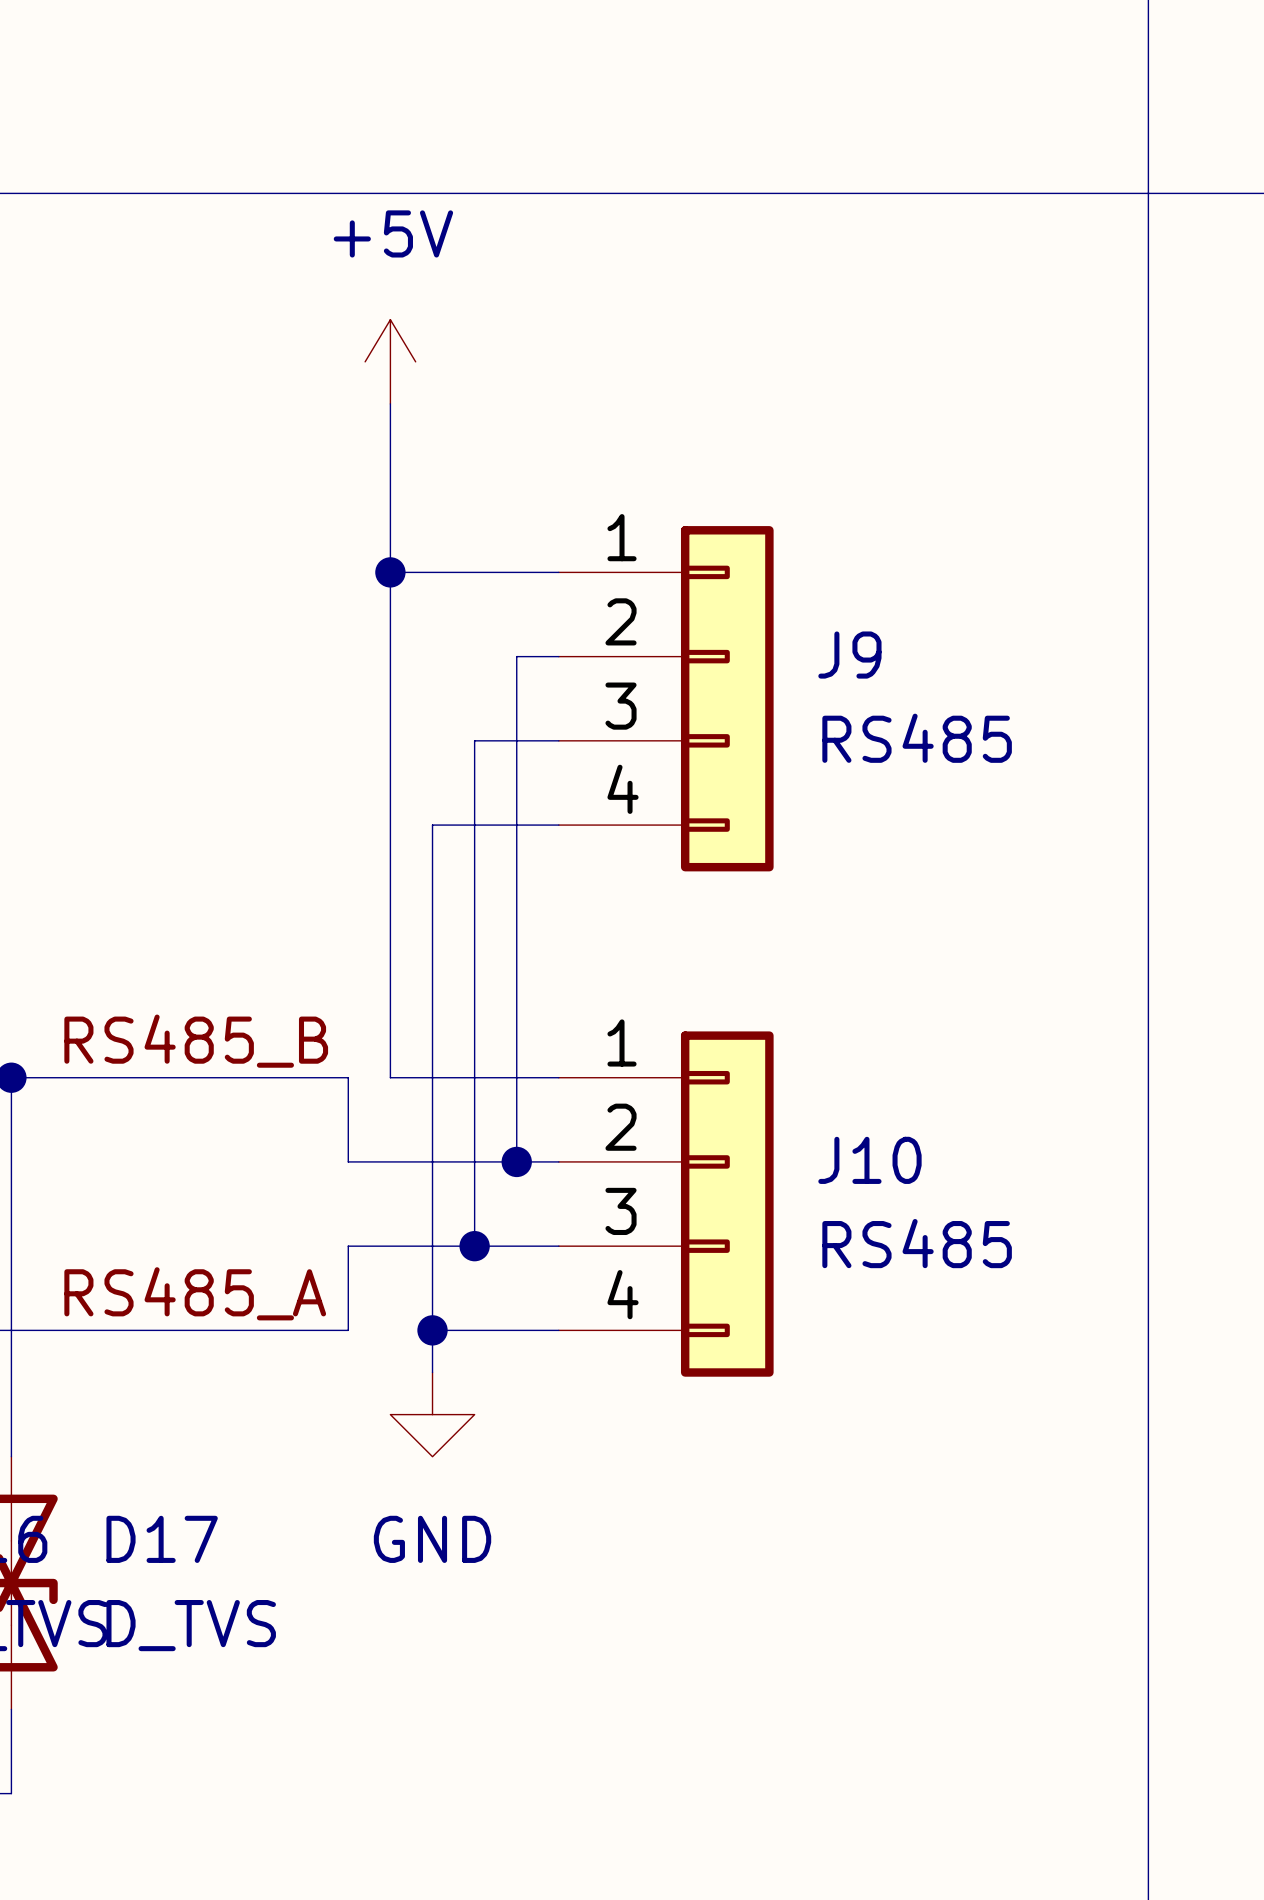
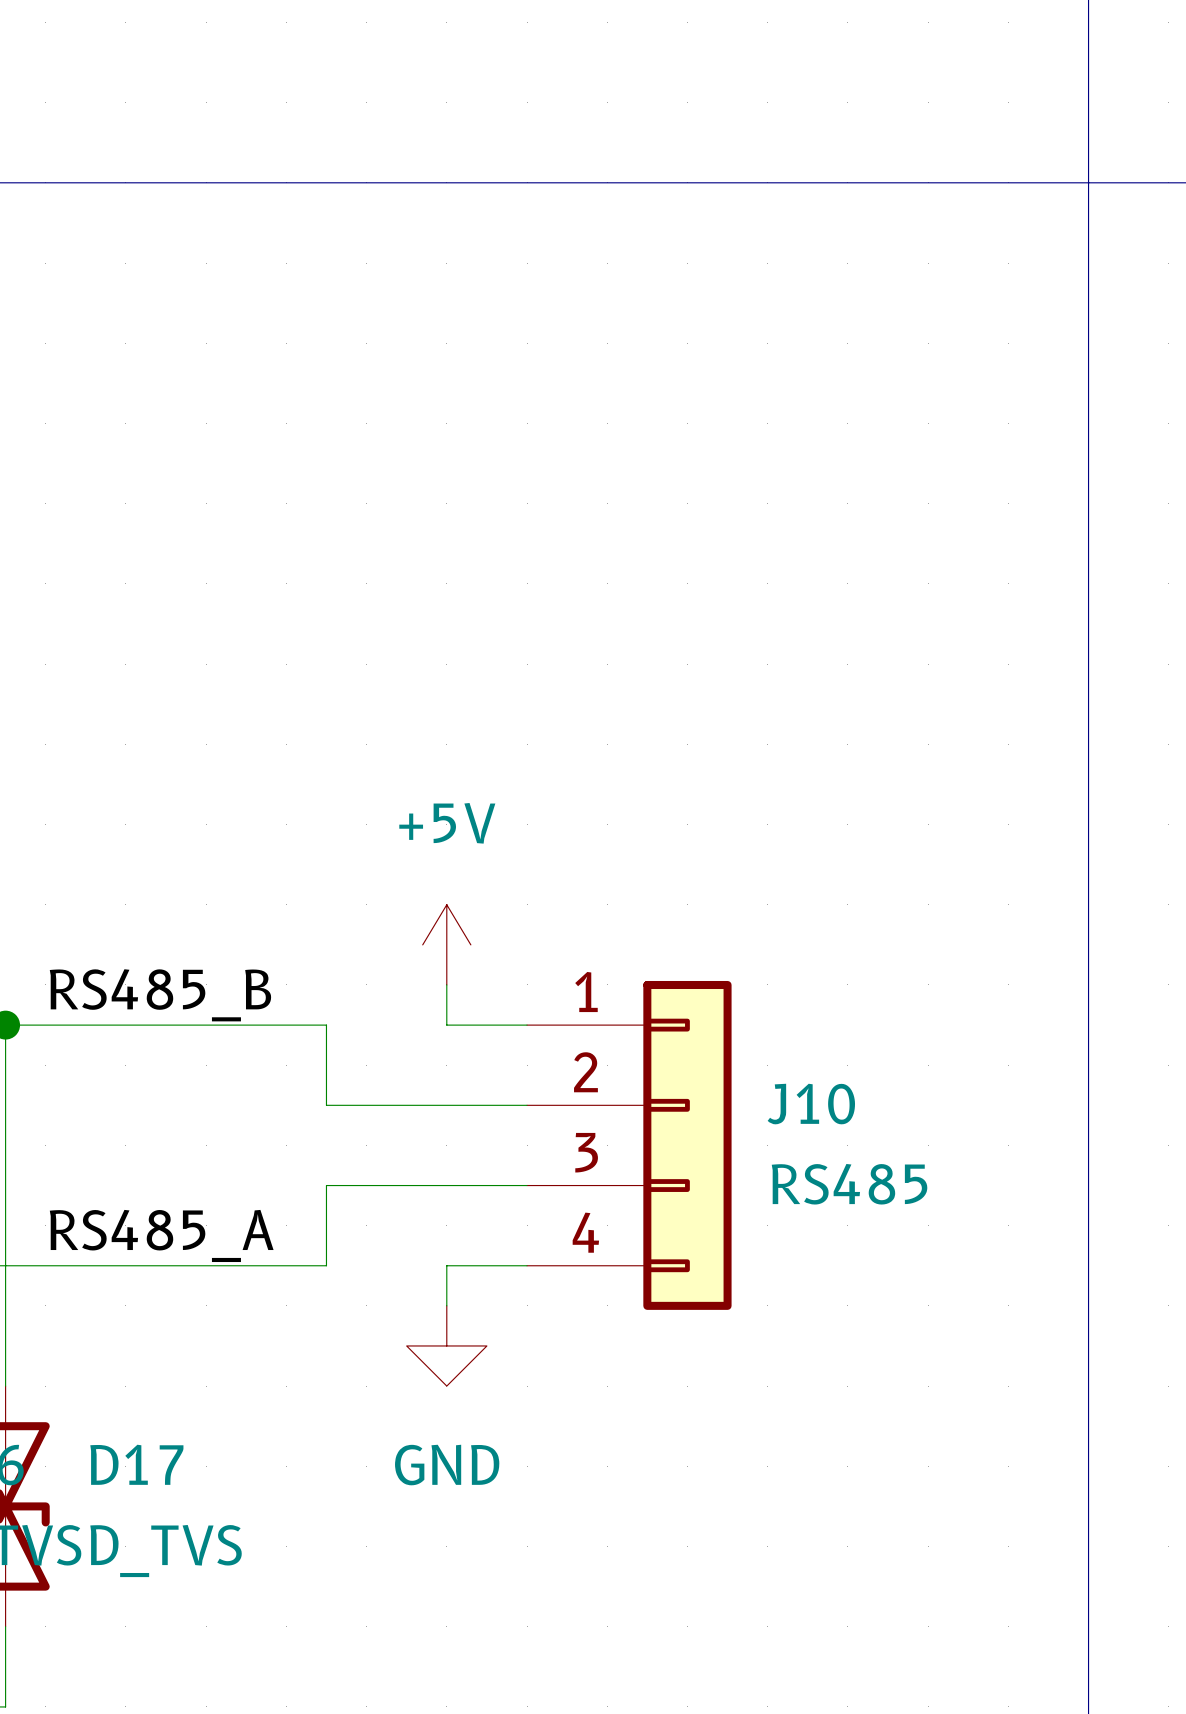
power symbol position: +5V (390, 361) -> +5V (446, 944)
wire: (390, 403) (390, 1077) (474, 1077) (474, 1246) -> none
wire: (390, 572) (558, 572) -> none
junction: (390, 572) -> none
wire: (558, 656) (516, 656) (516, 1161) -> none
J9: RS485 (666, 698) -> none
wire: (558, 740) (474, 740) (474, 1035) -> none
wire: (558, 825) (432, 825) (432, 1372) -> none
junction: (516, 1161) -> none
junction: (474, 1246) -> none
wire: (432, 1330) (474, 1330) -> (446, 1305) (446, 1265)
junction: (432, 1330) -> none
power symbol position: GND (432, 1414) -> GND (446, 1345)

